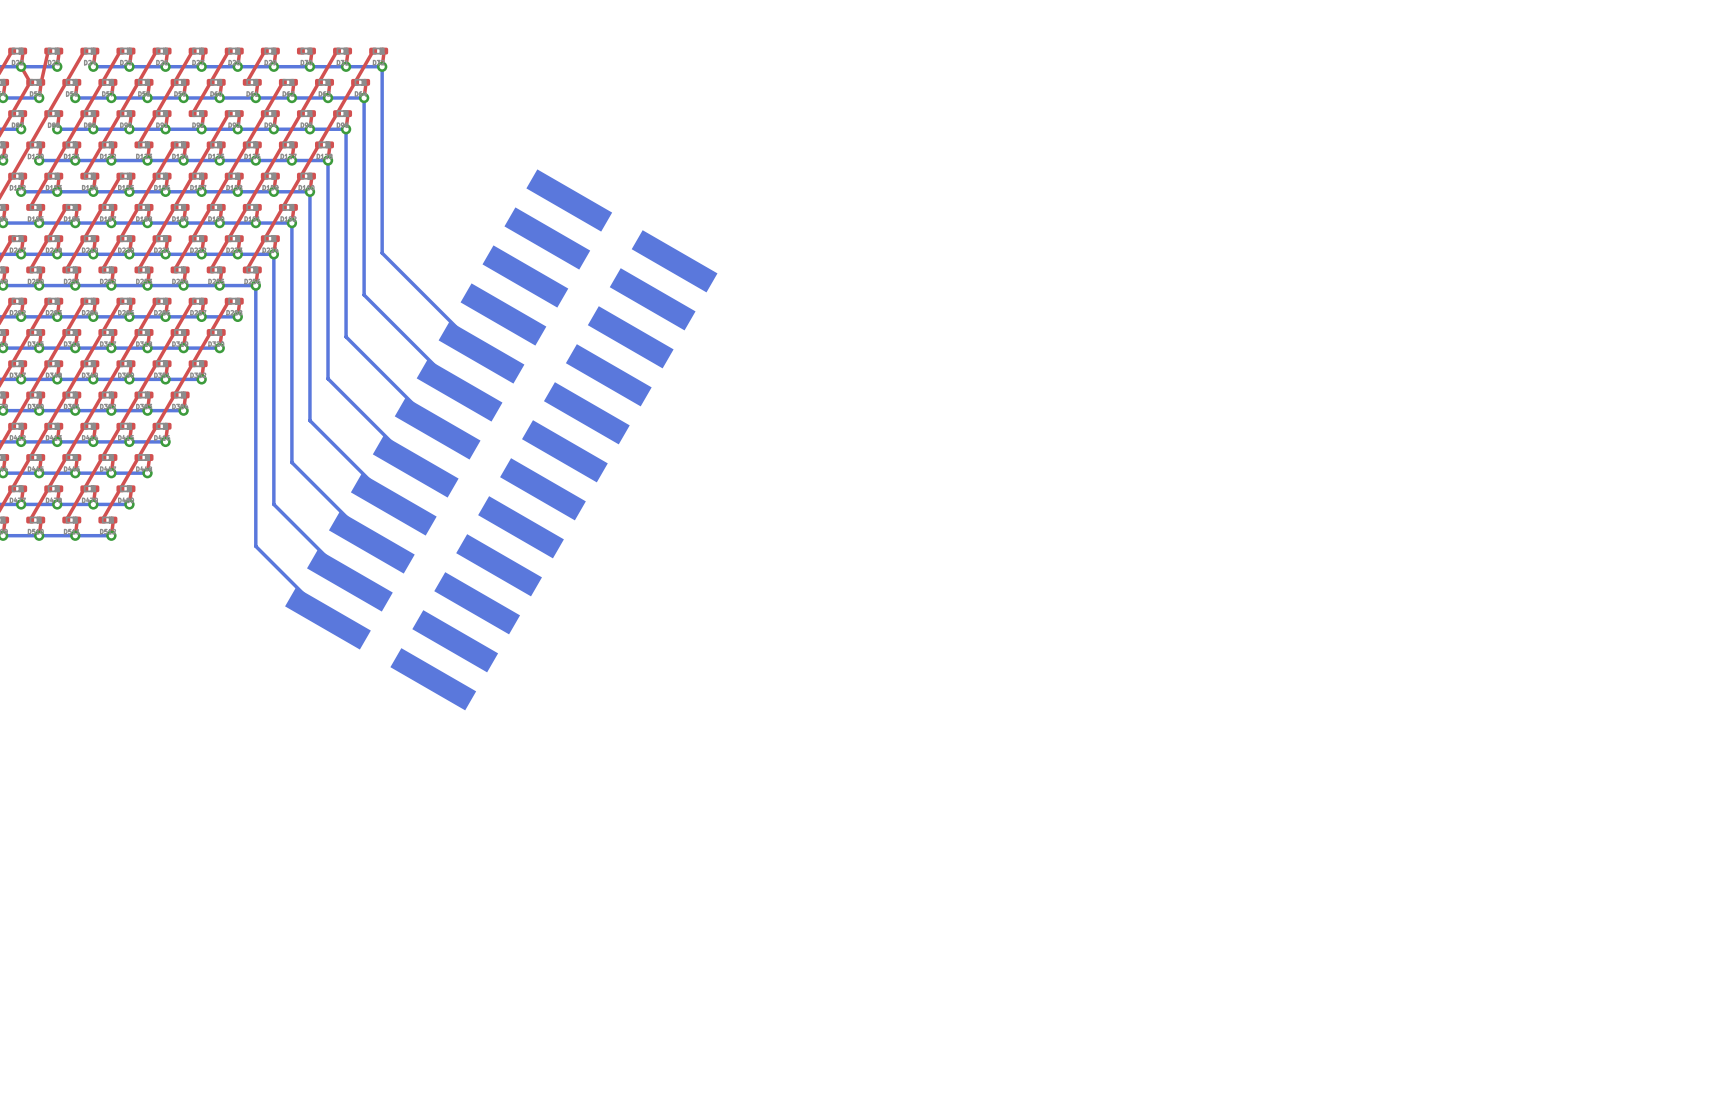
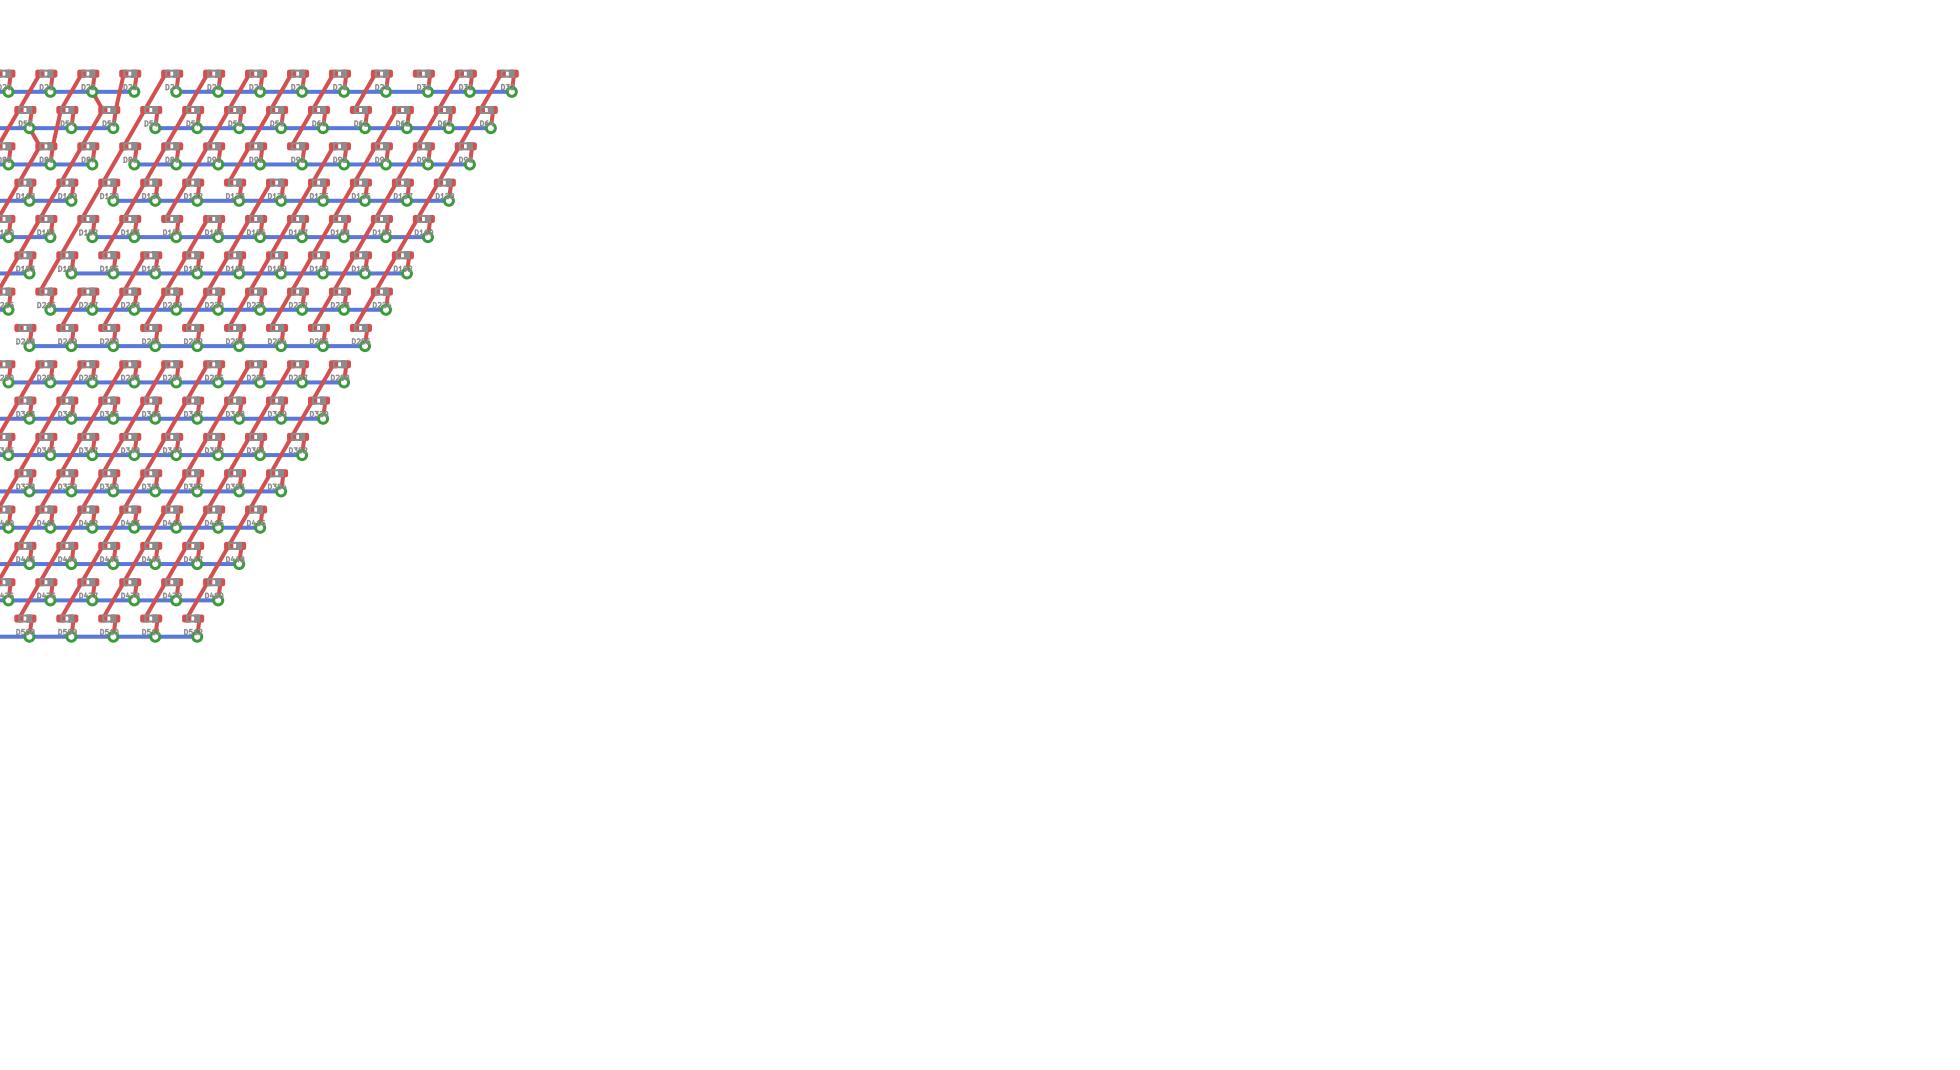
bottom track: (382, 66) (382, 253) (481, 352) -> none
bottom track: (364, 97) (364, 295) (459, 390) -> none
bottom track: (346, 129) (346, 336) (437, 428) -> none
bottom track: (328, 160) (328, 378) (415, 466) -> none
bottom track: (309, 191) (309, 420) (393, 504) -> none
bottom track: (291, 223) (291, 462) (371, 542) -> none
bottom track: (273, 254) (273, 504) (349, 580) -> none
bottom track: (255, 285) (255, 546) (327, 618) -> none
part: (501, 439) -> none

